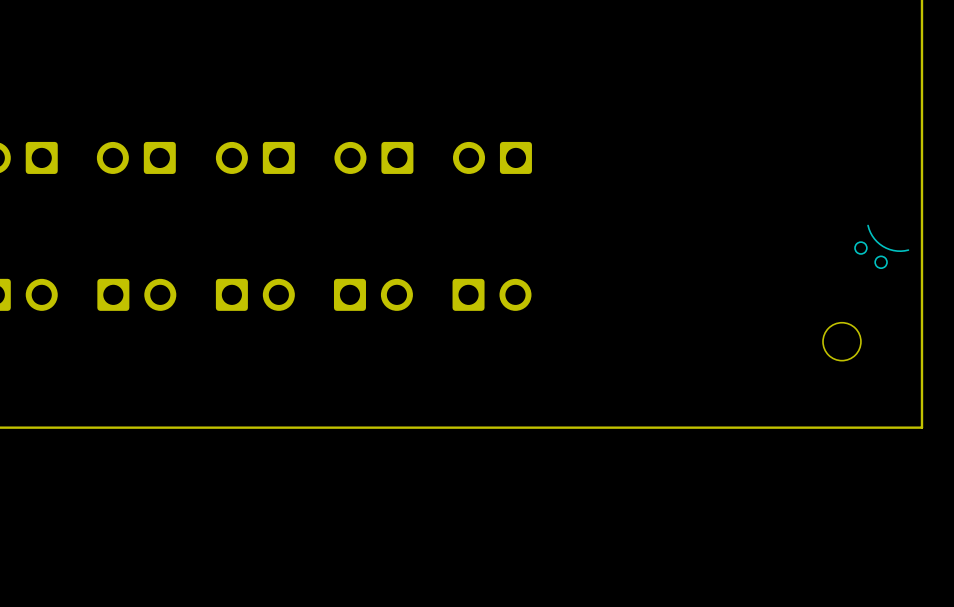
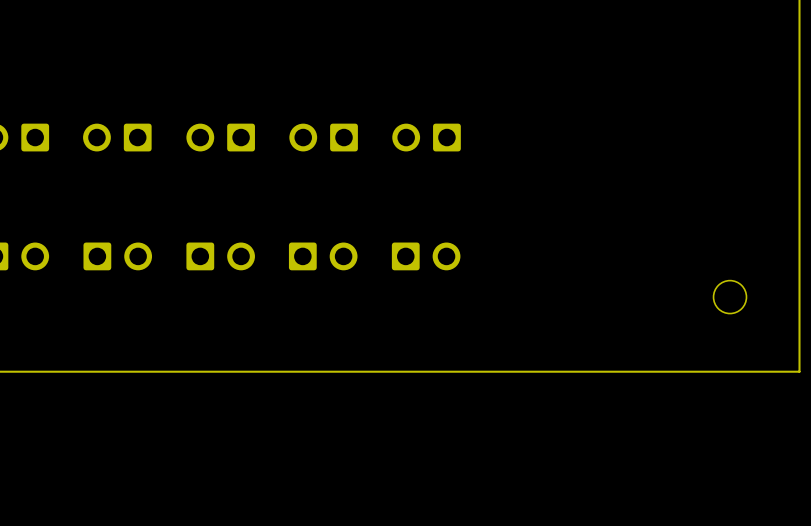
line: (868, 225) (872, 235) (883, 246) (897, 251) (908, 250) -> none
drawing: [854, 241, 888, 269] -> none

